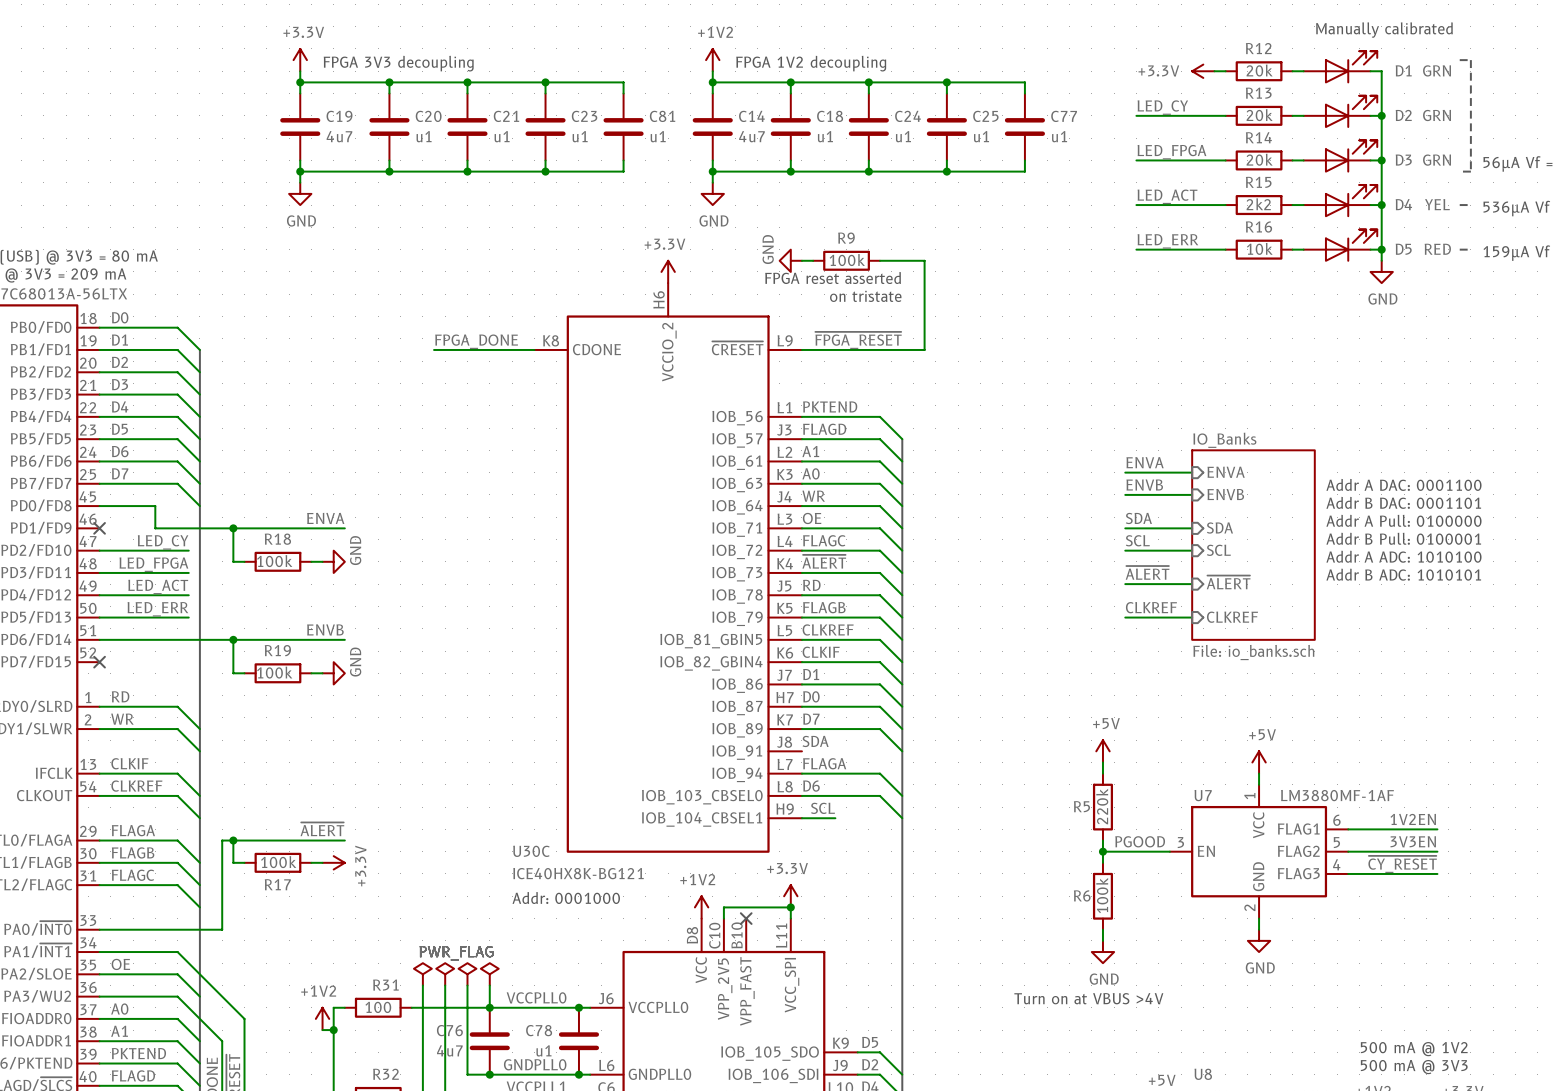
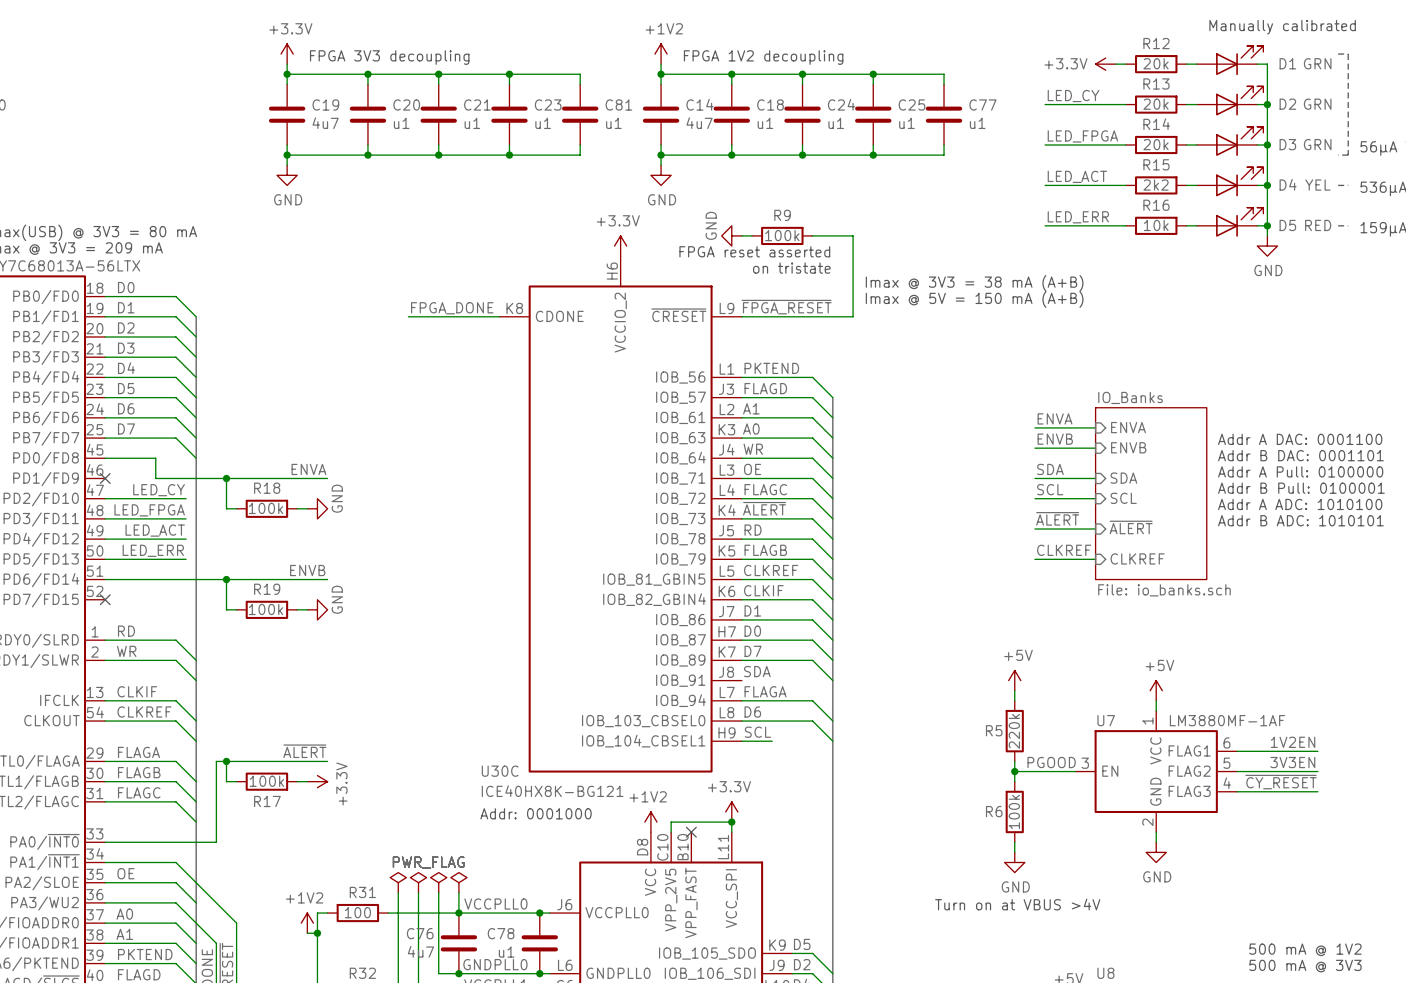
text: none -> Imax @ 3V3 = 38 mA (A+B) (974, 283)
text: none -> Imax @ 5V = 150 mA (A+B) (974, 299)

